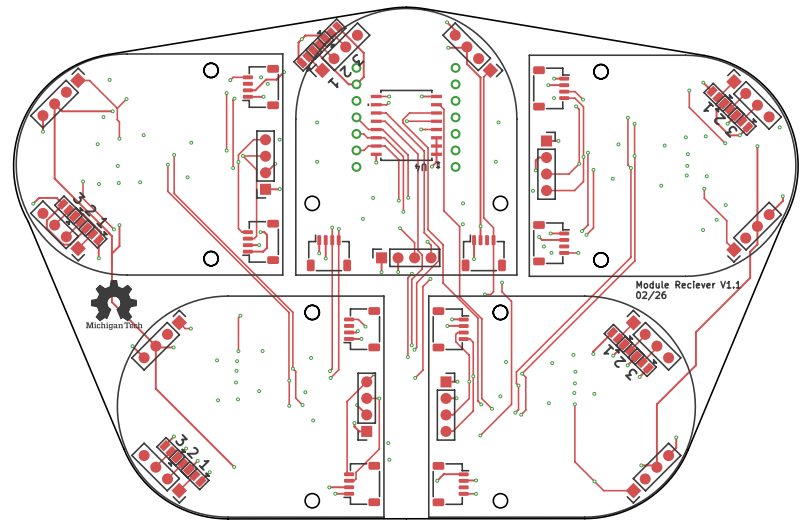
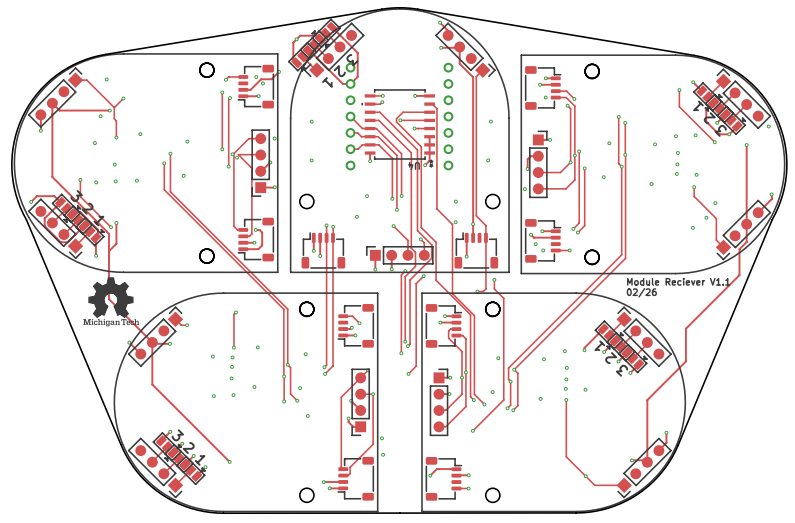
via: none -> (232, 154)
via: (242, 155) -> none
via: none -> (237, 157)
via: (238, 162) -> none

